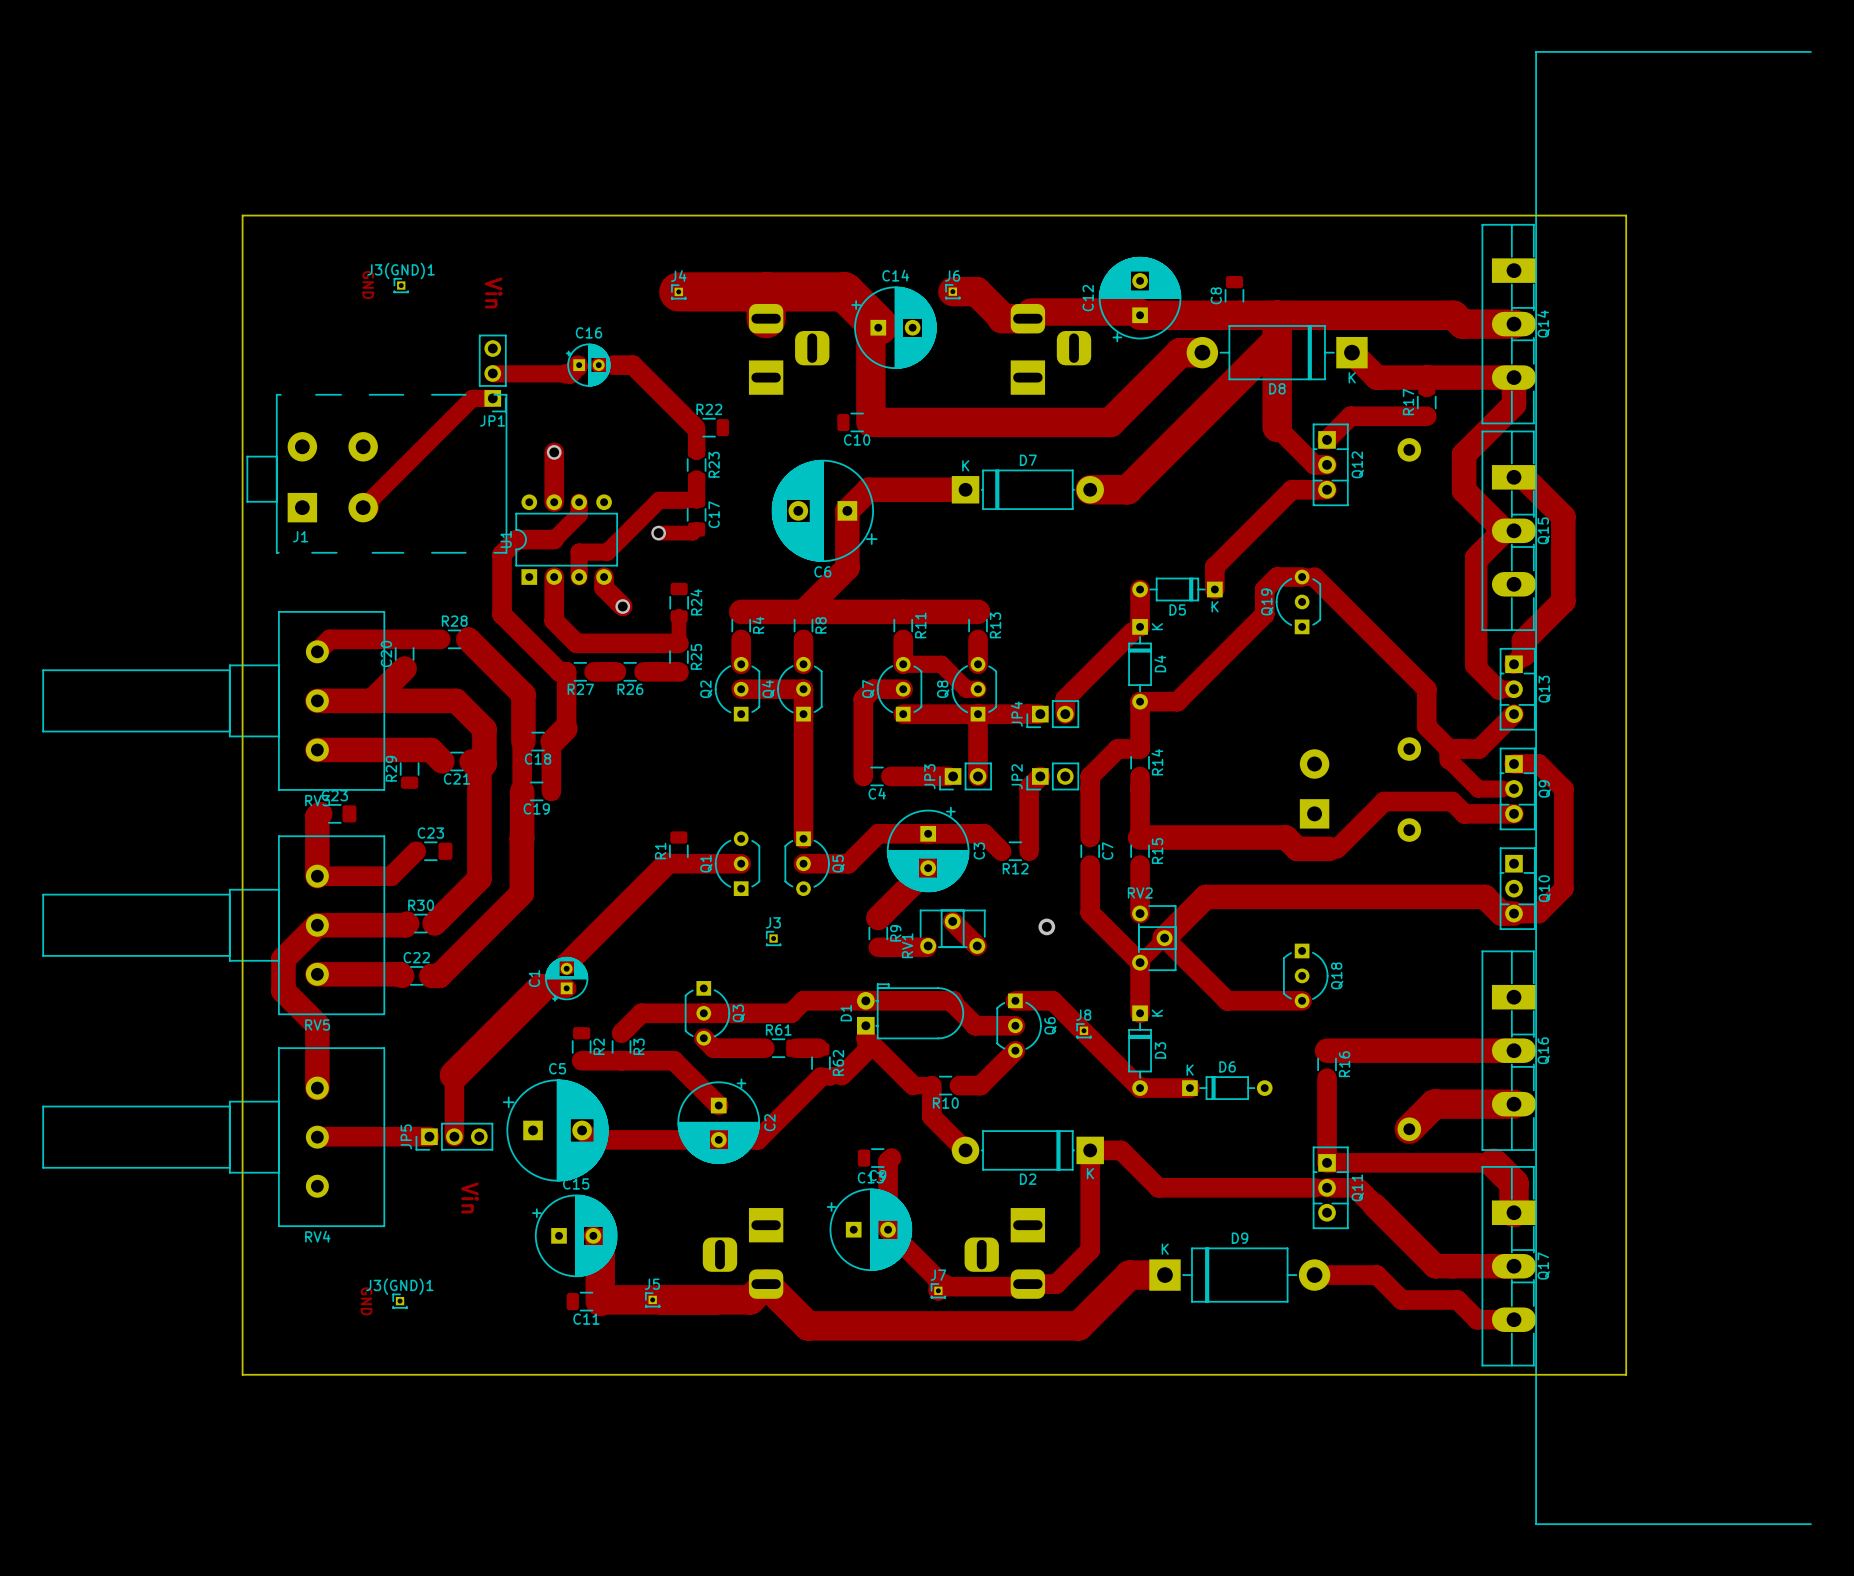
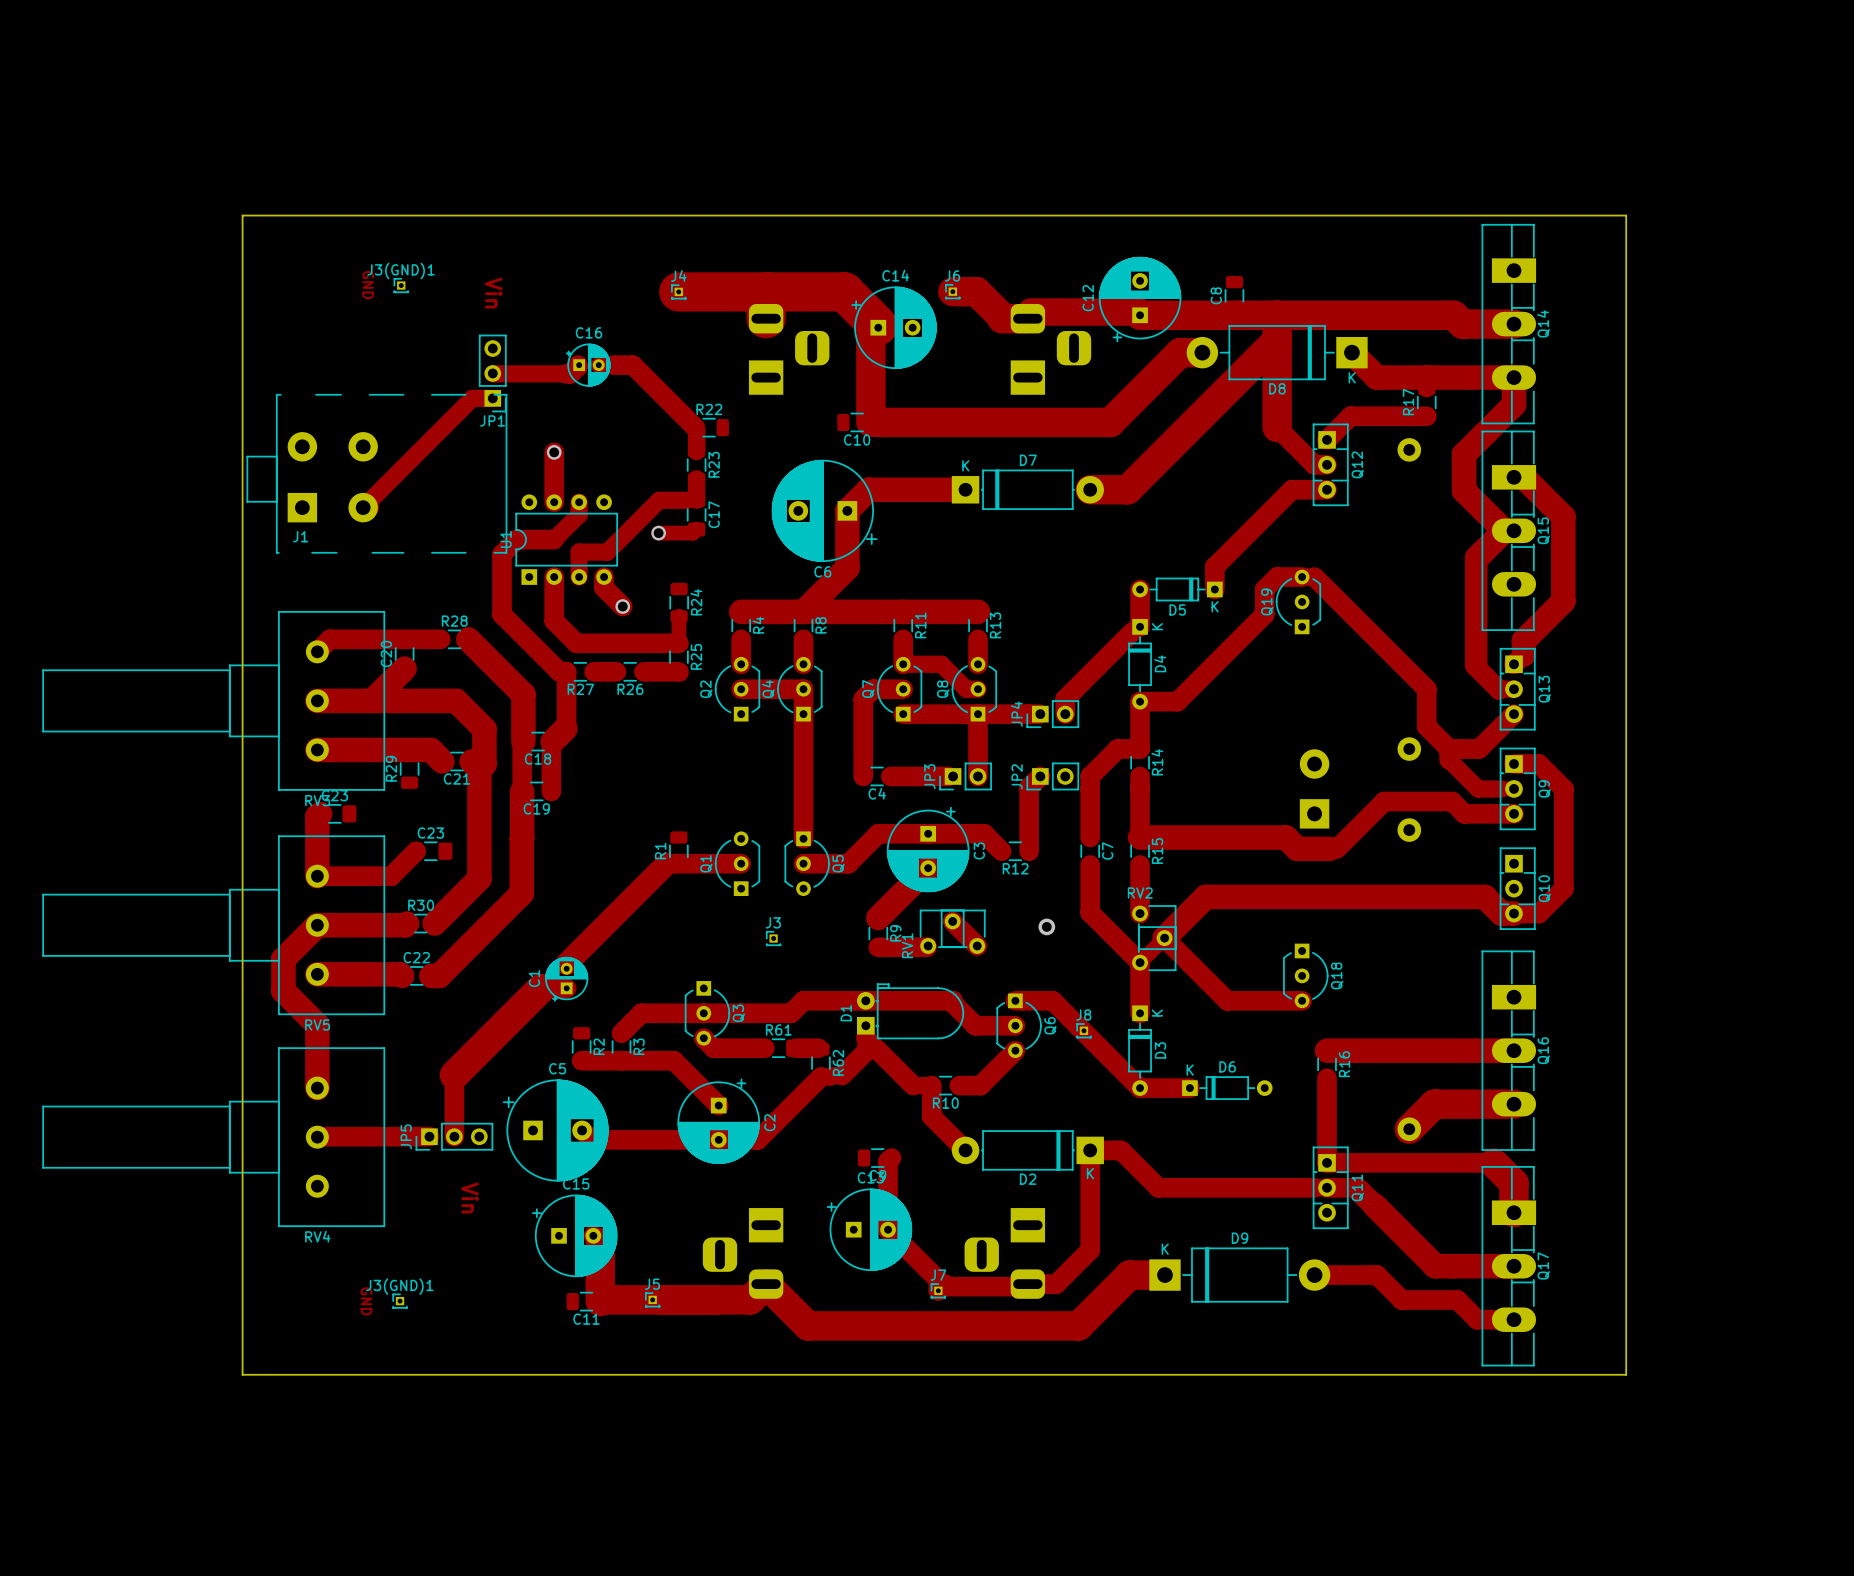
drawing: [1535, 51, 1812, 1525] -> none

